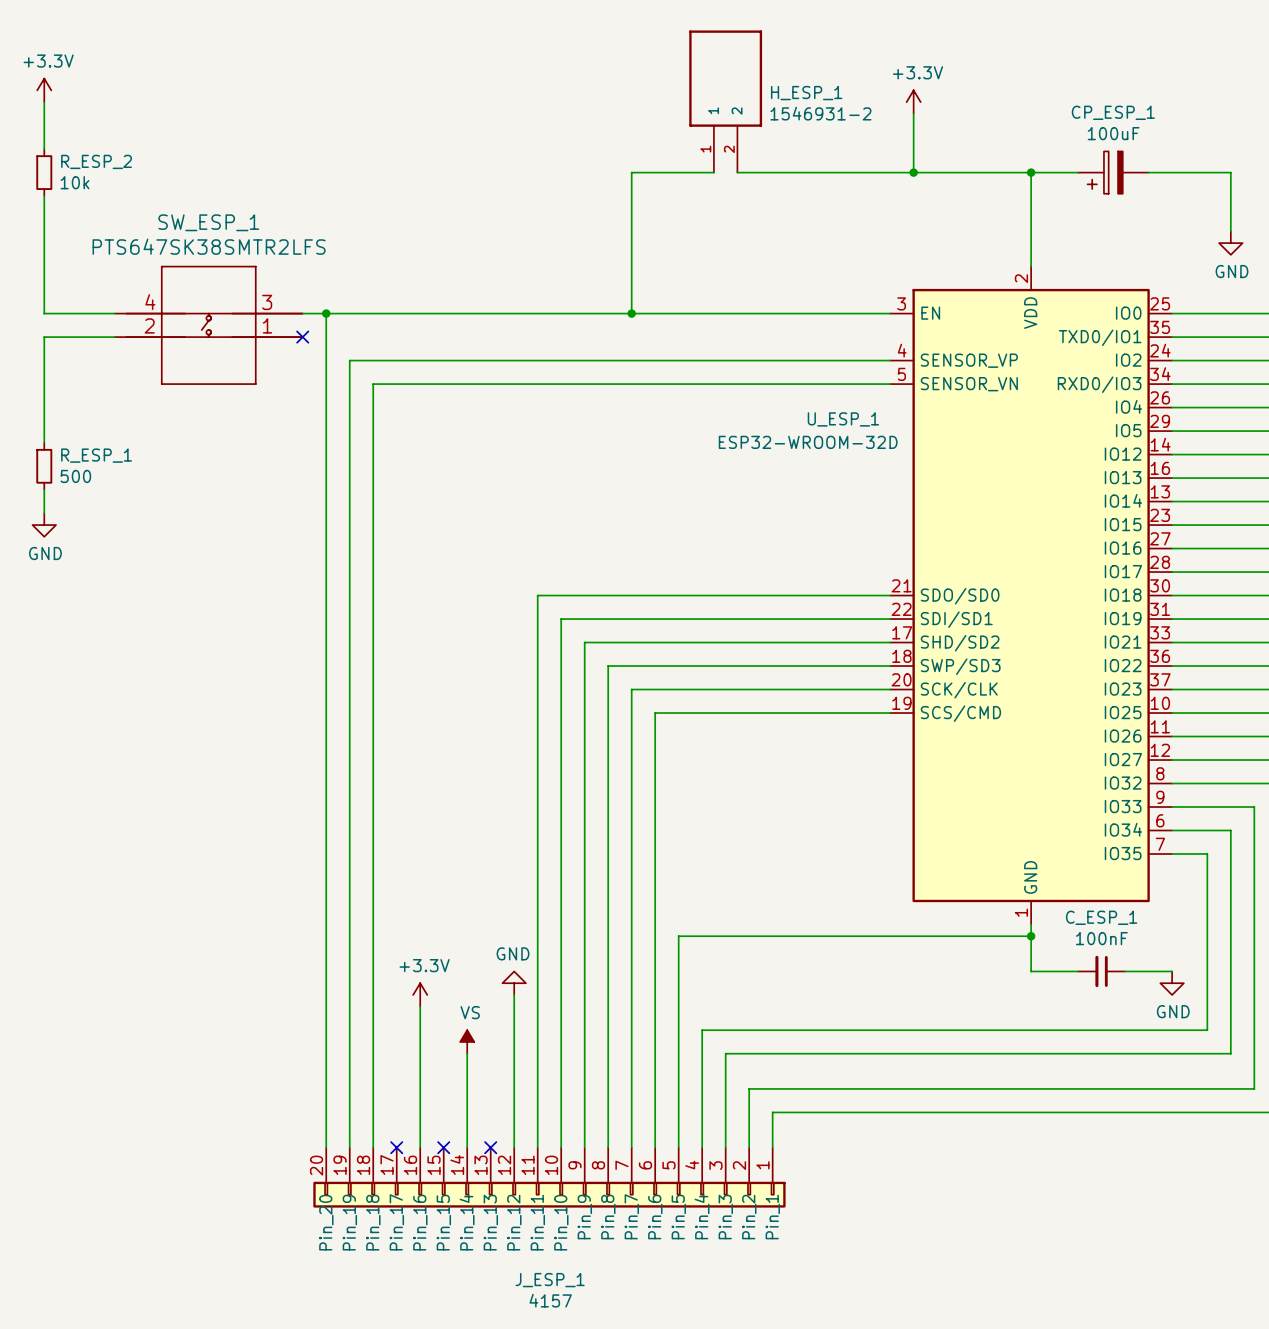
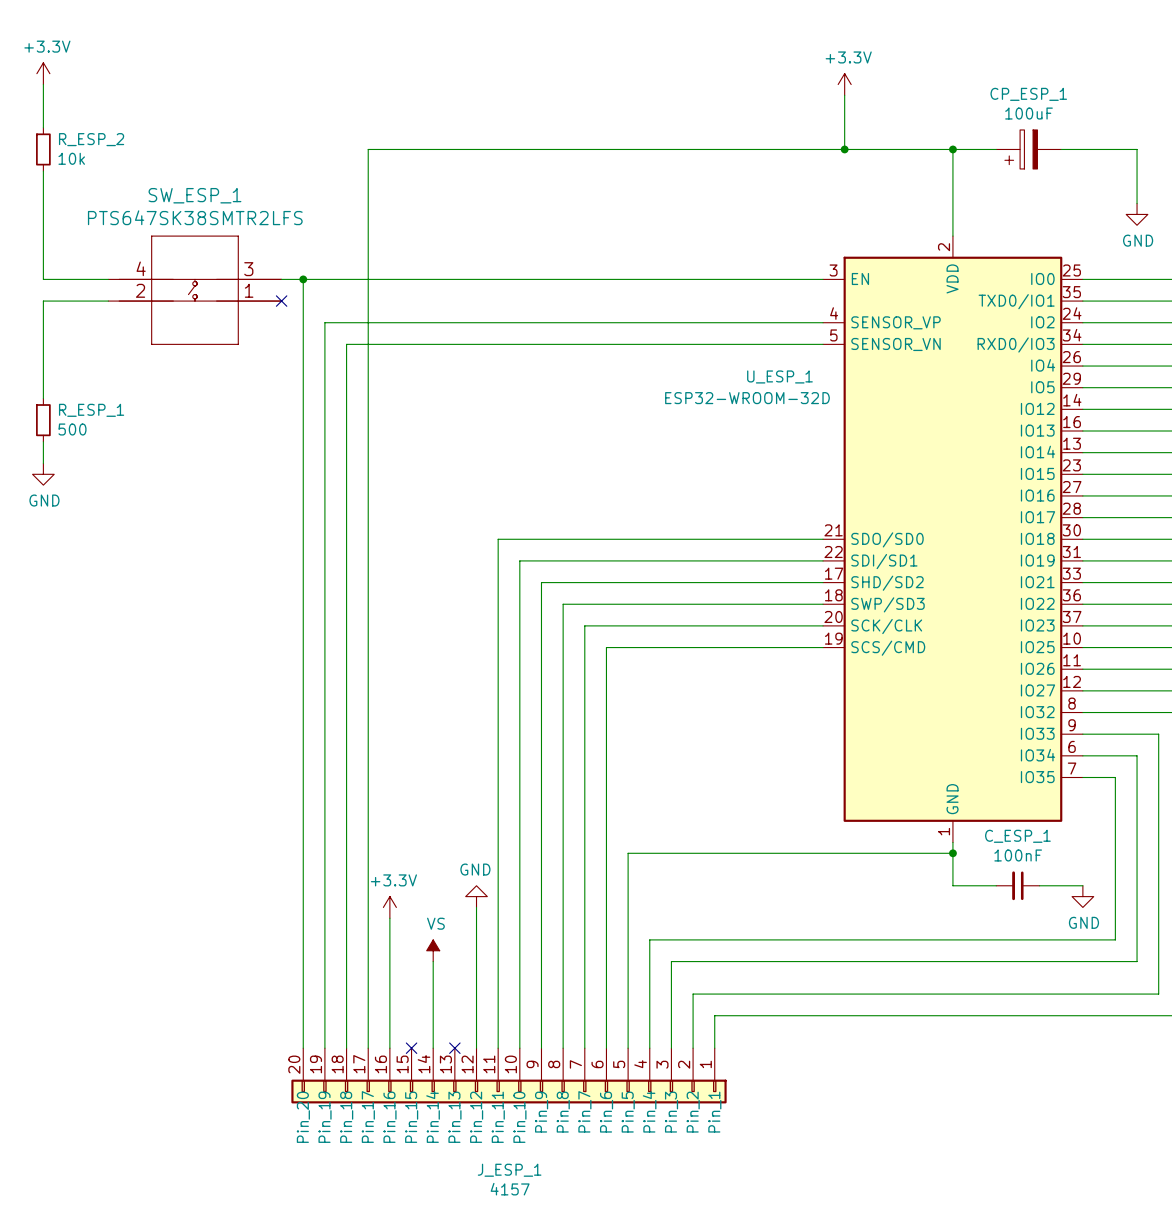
H_ESP_1: 1546931-2 (725, 101) -> none
wire: (631, 172) (631, 313) -> (584, 149) (368, 149) (368, 1048)
wire: none -> (660, 149) (682, 149)
junction: (631, 313) -> none
no-connect mark: (396, 1147) -> none

